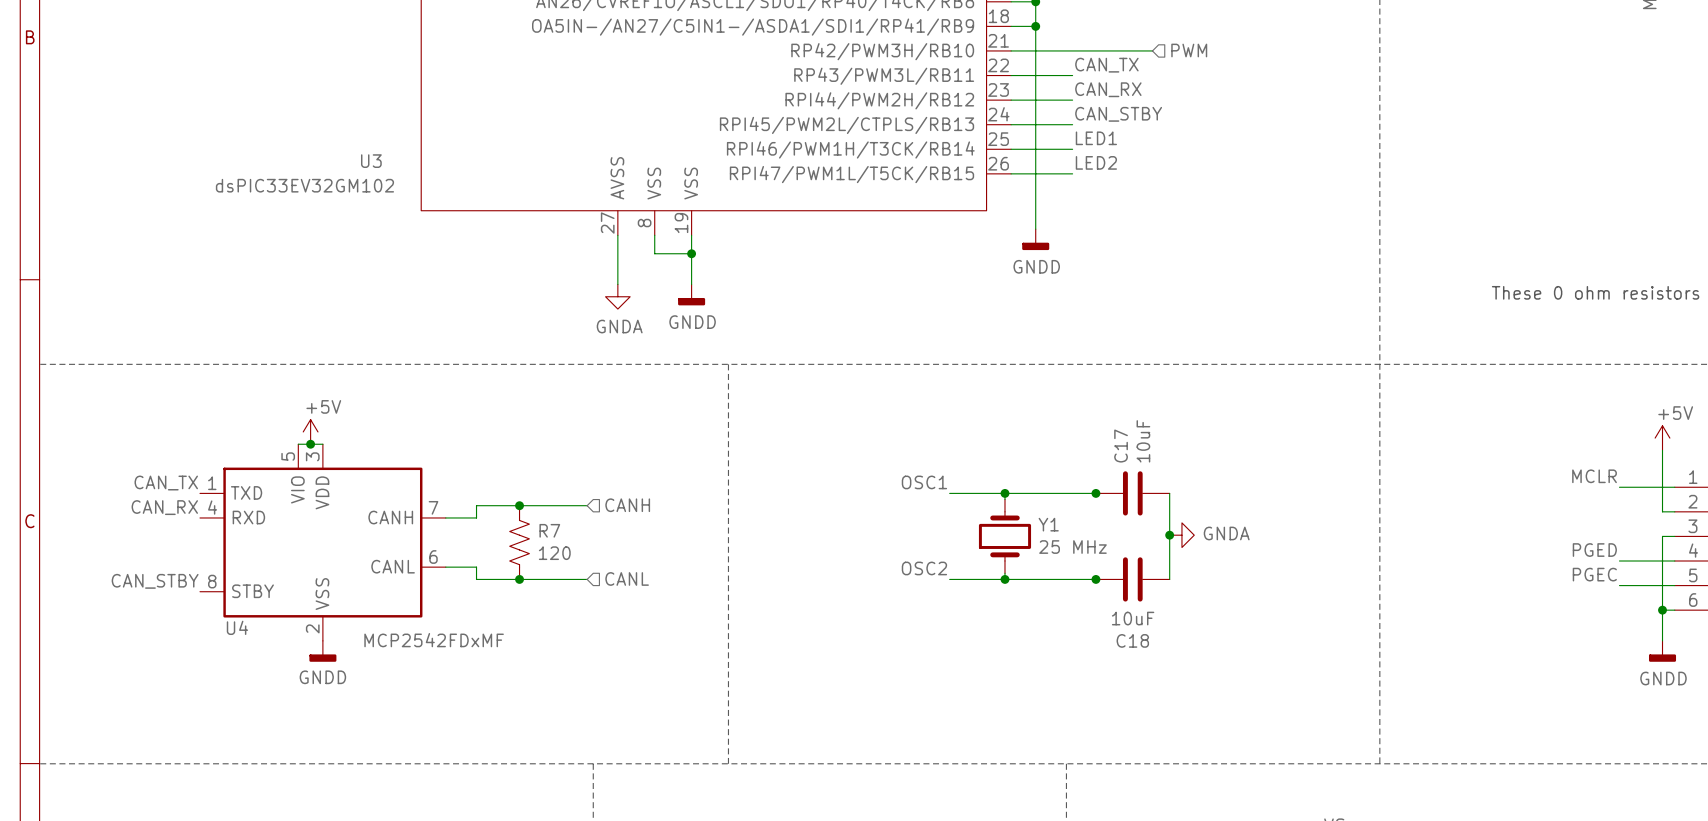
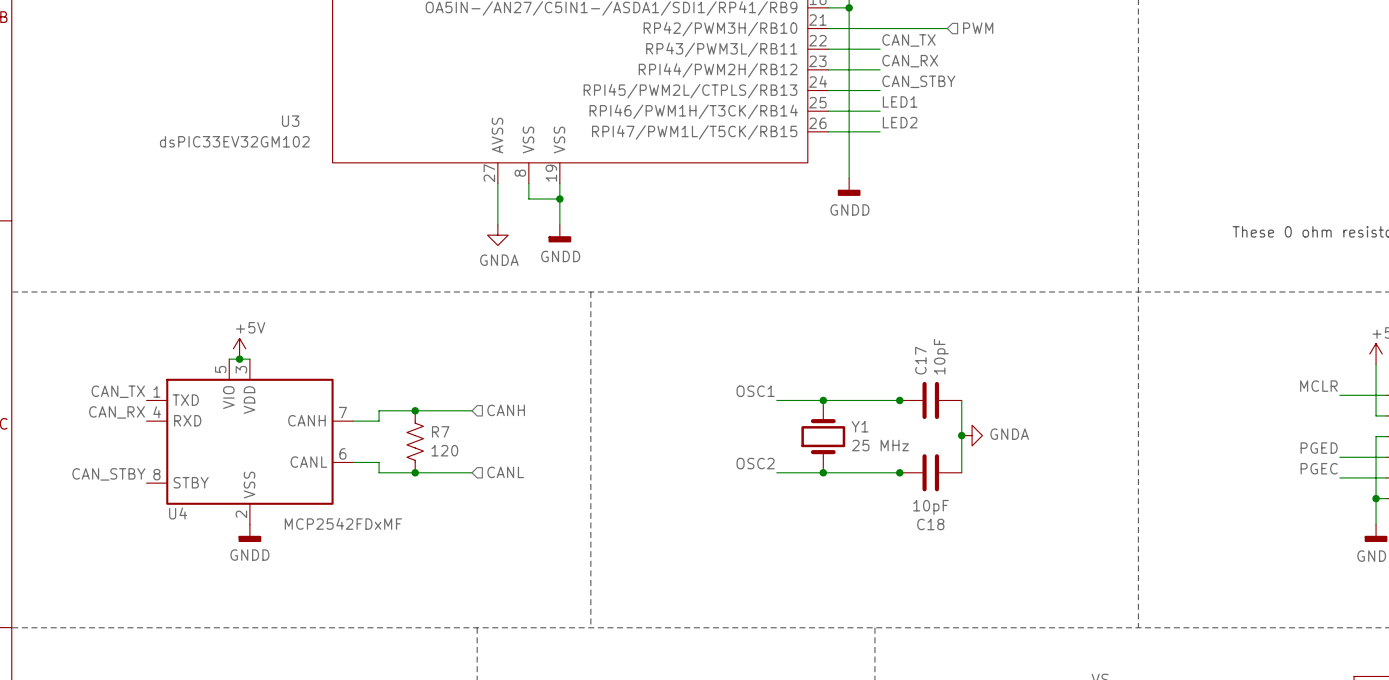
C17 value: 10uF (1143, 441) -> 10pF (941, 356)
C18 value: 10uF (1133, 618) -> 10pF (931, 507)

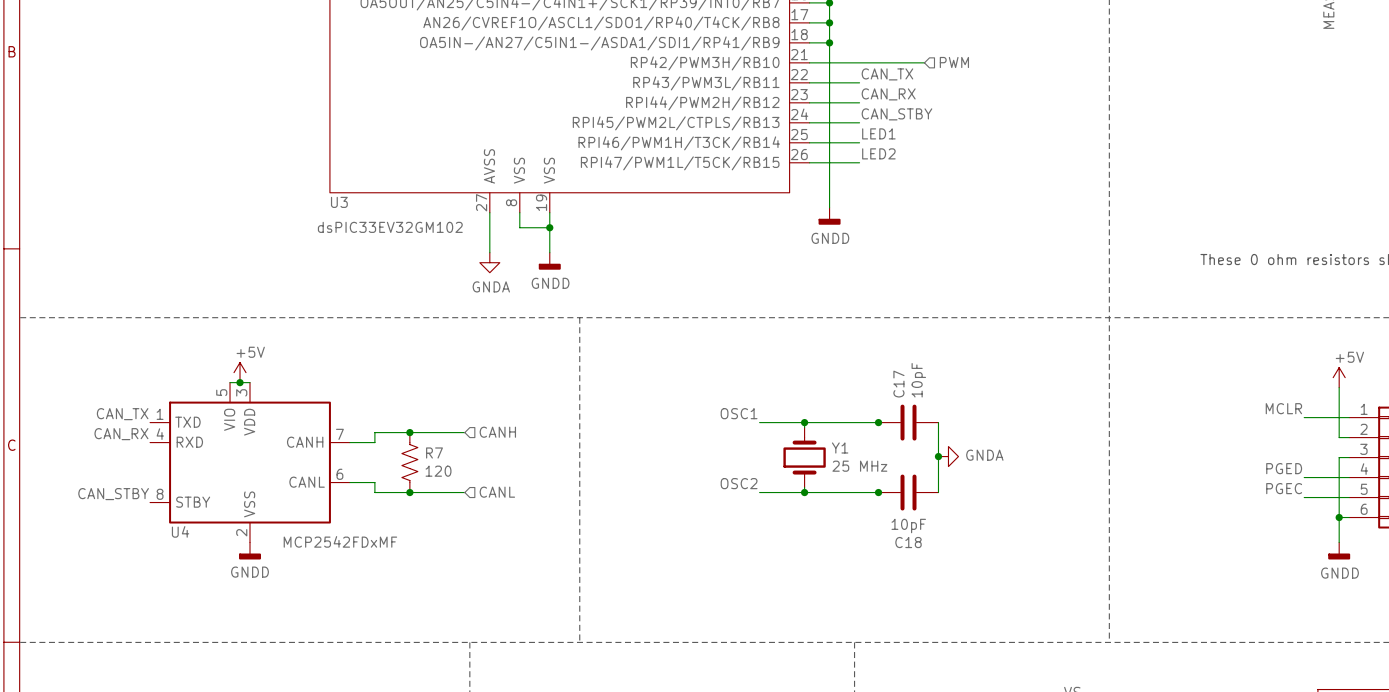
U3 name position: U3 (290, 121) -> U3 (339, 202)
U3 value position: dsPIC33EV32GM102 (234, 141) -> dsPIC33EV32GM102 (390, 227)

